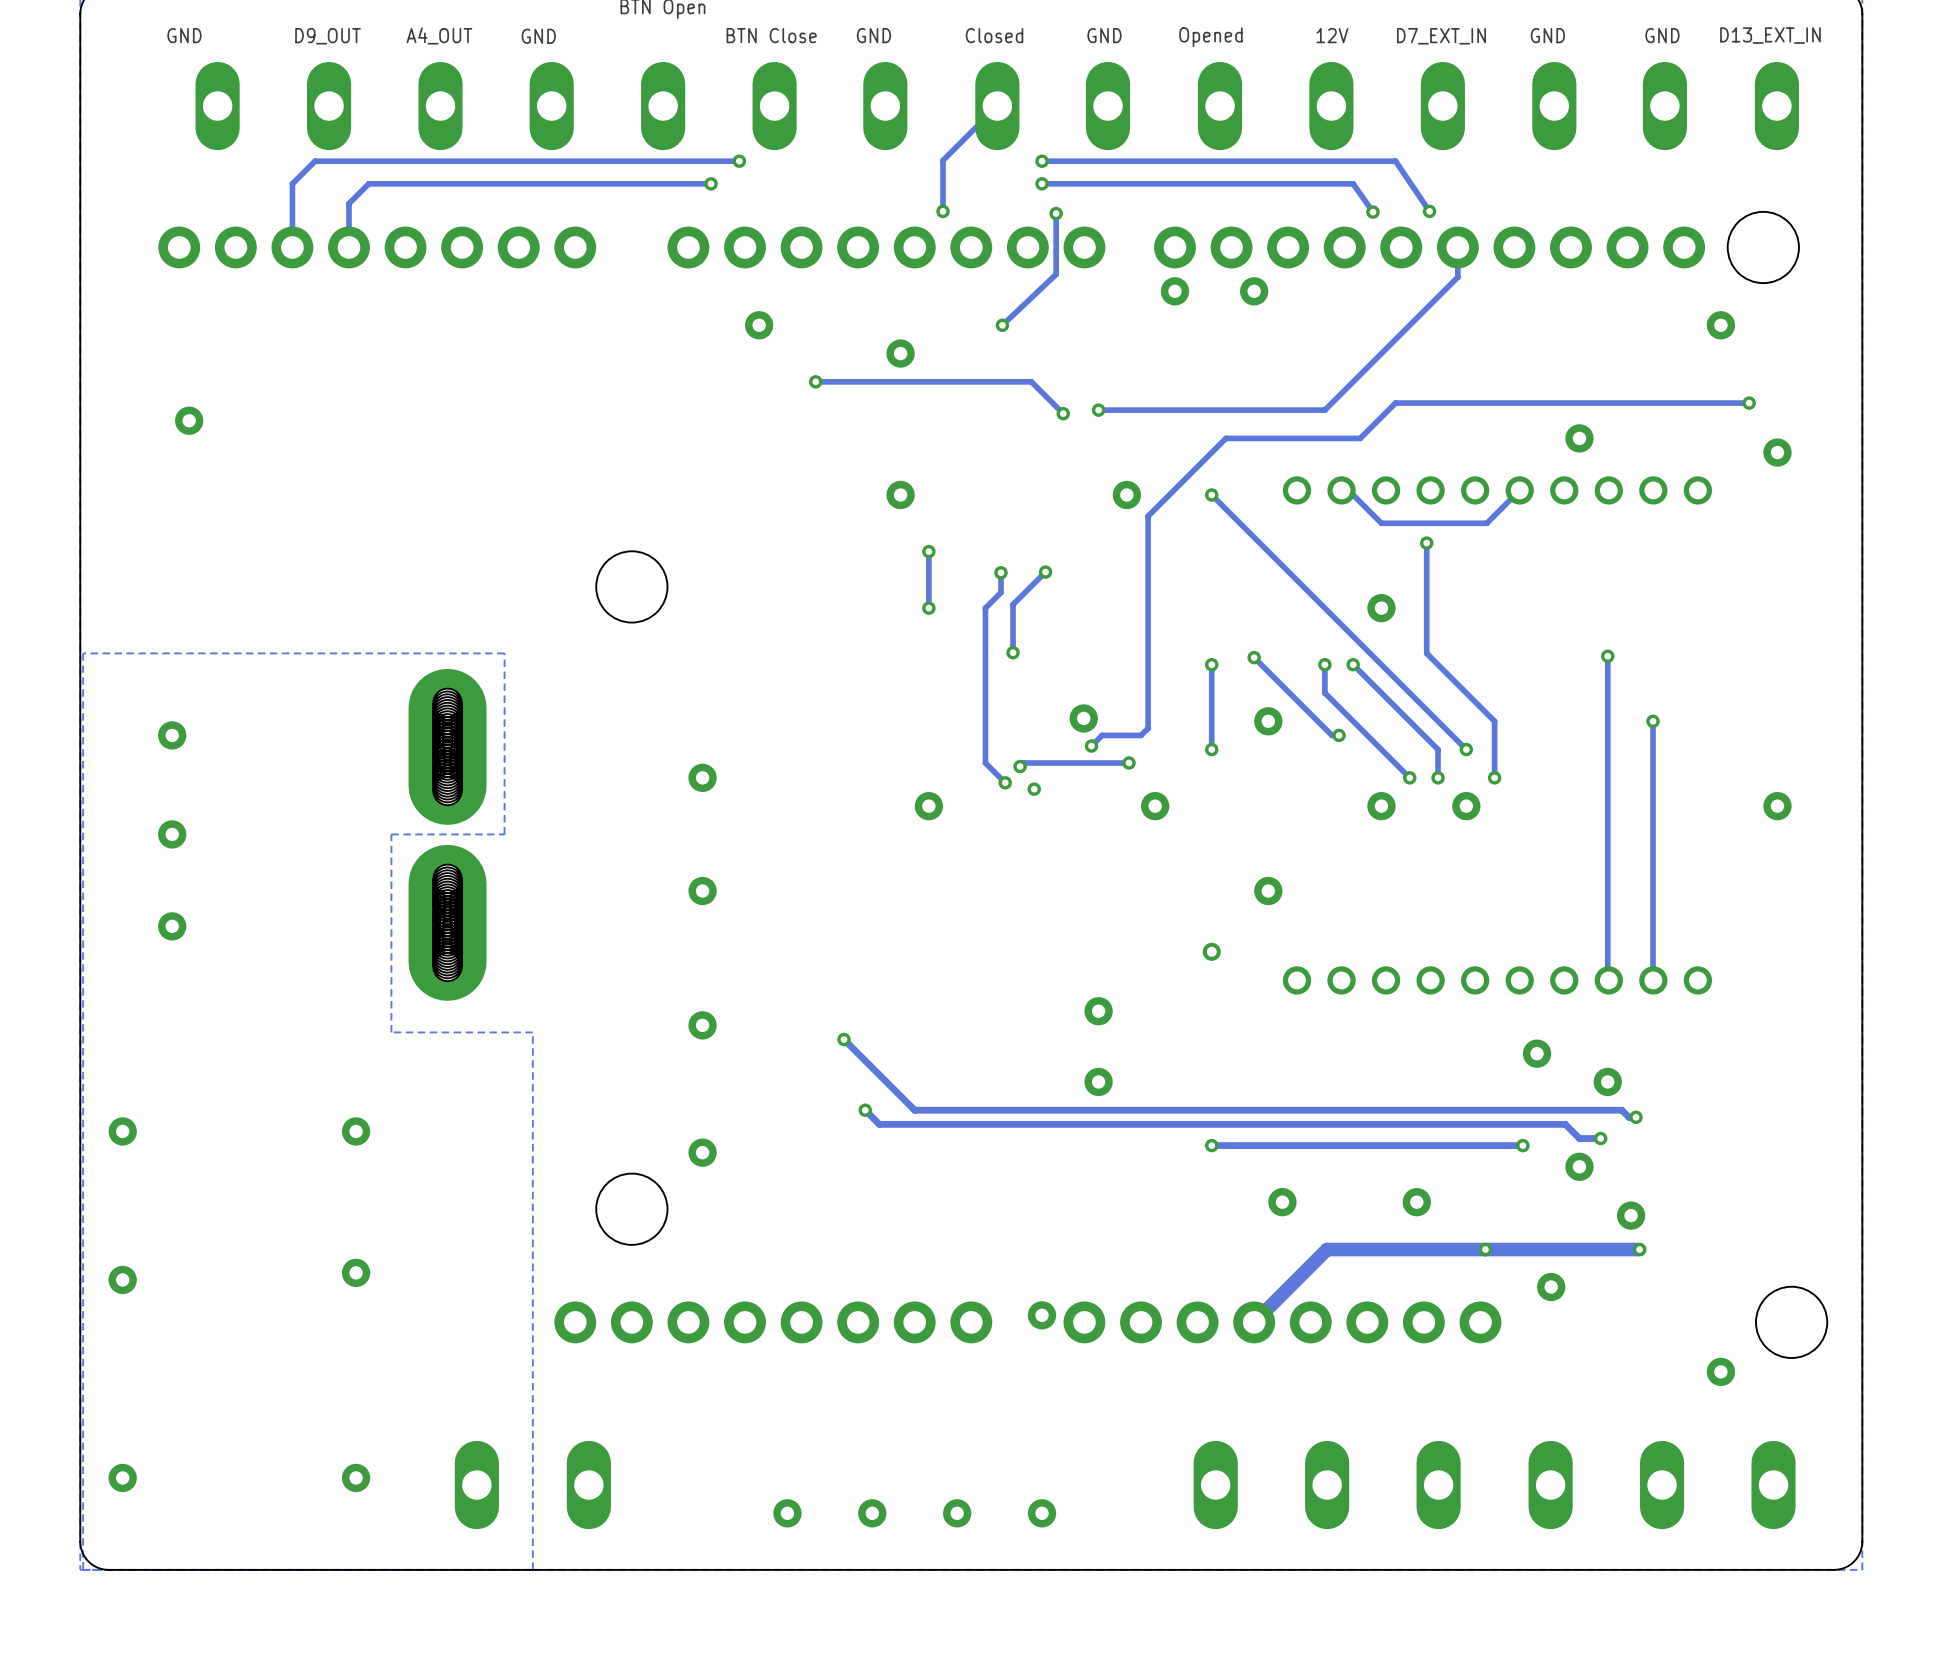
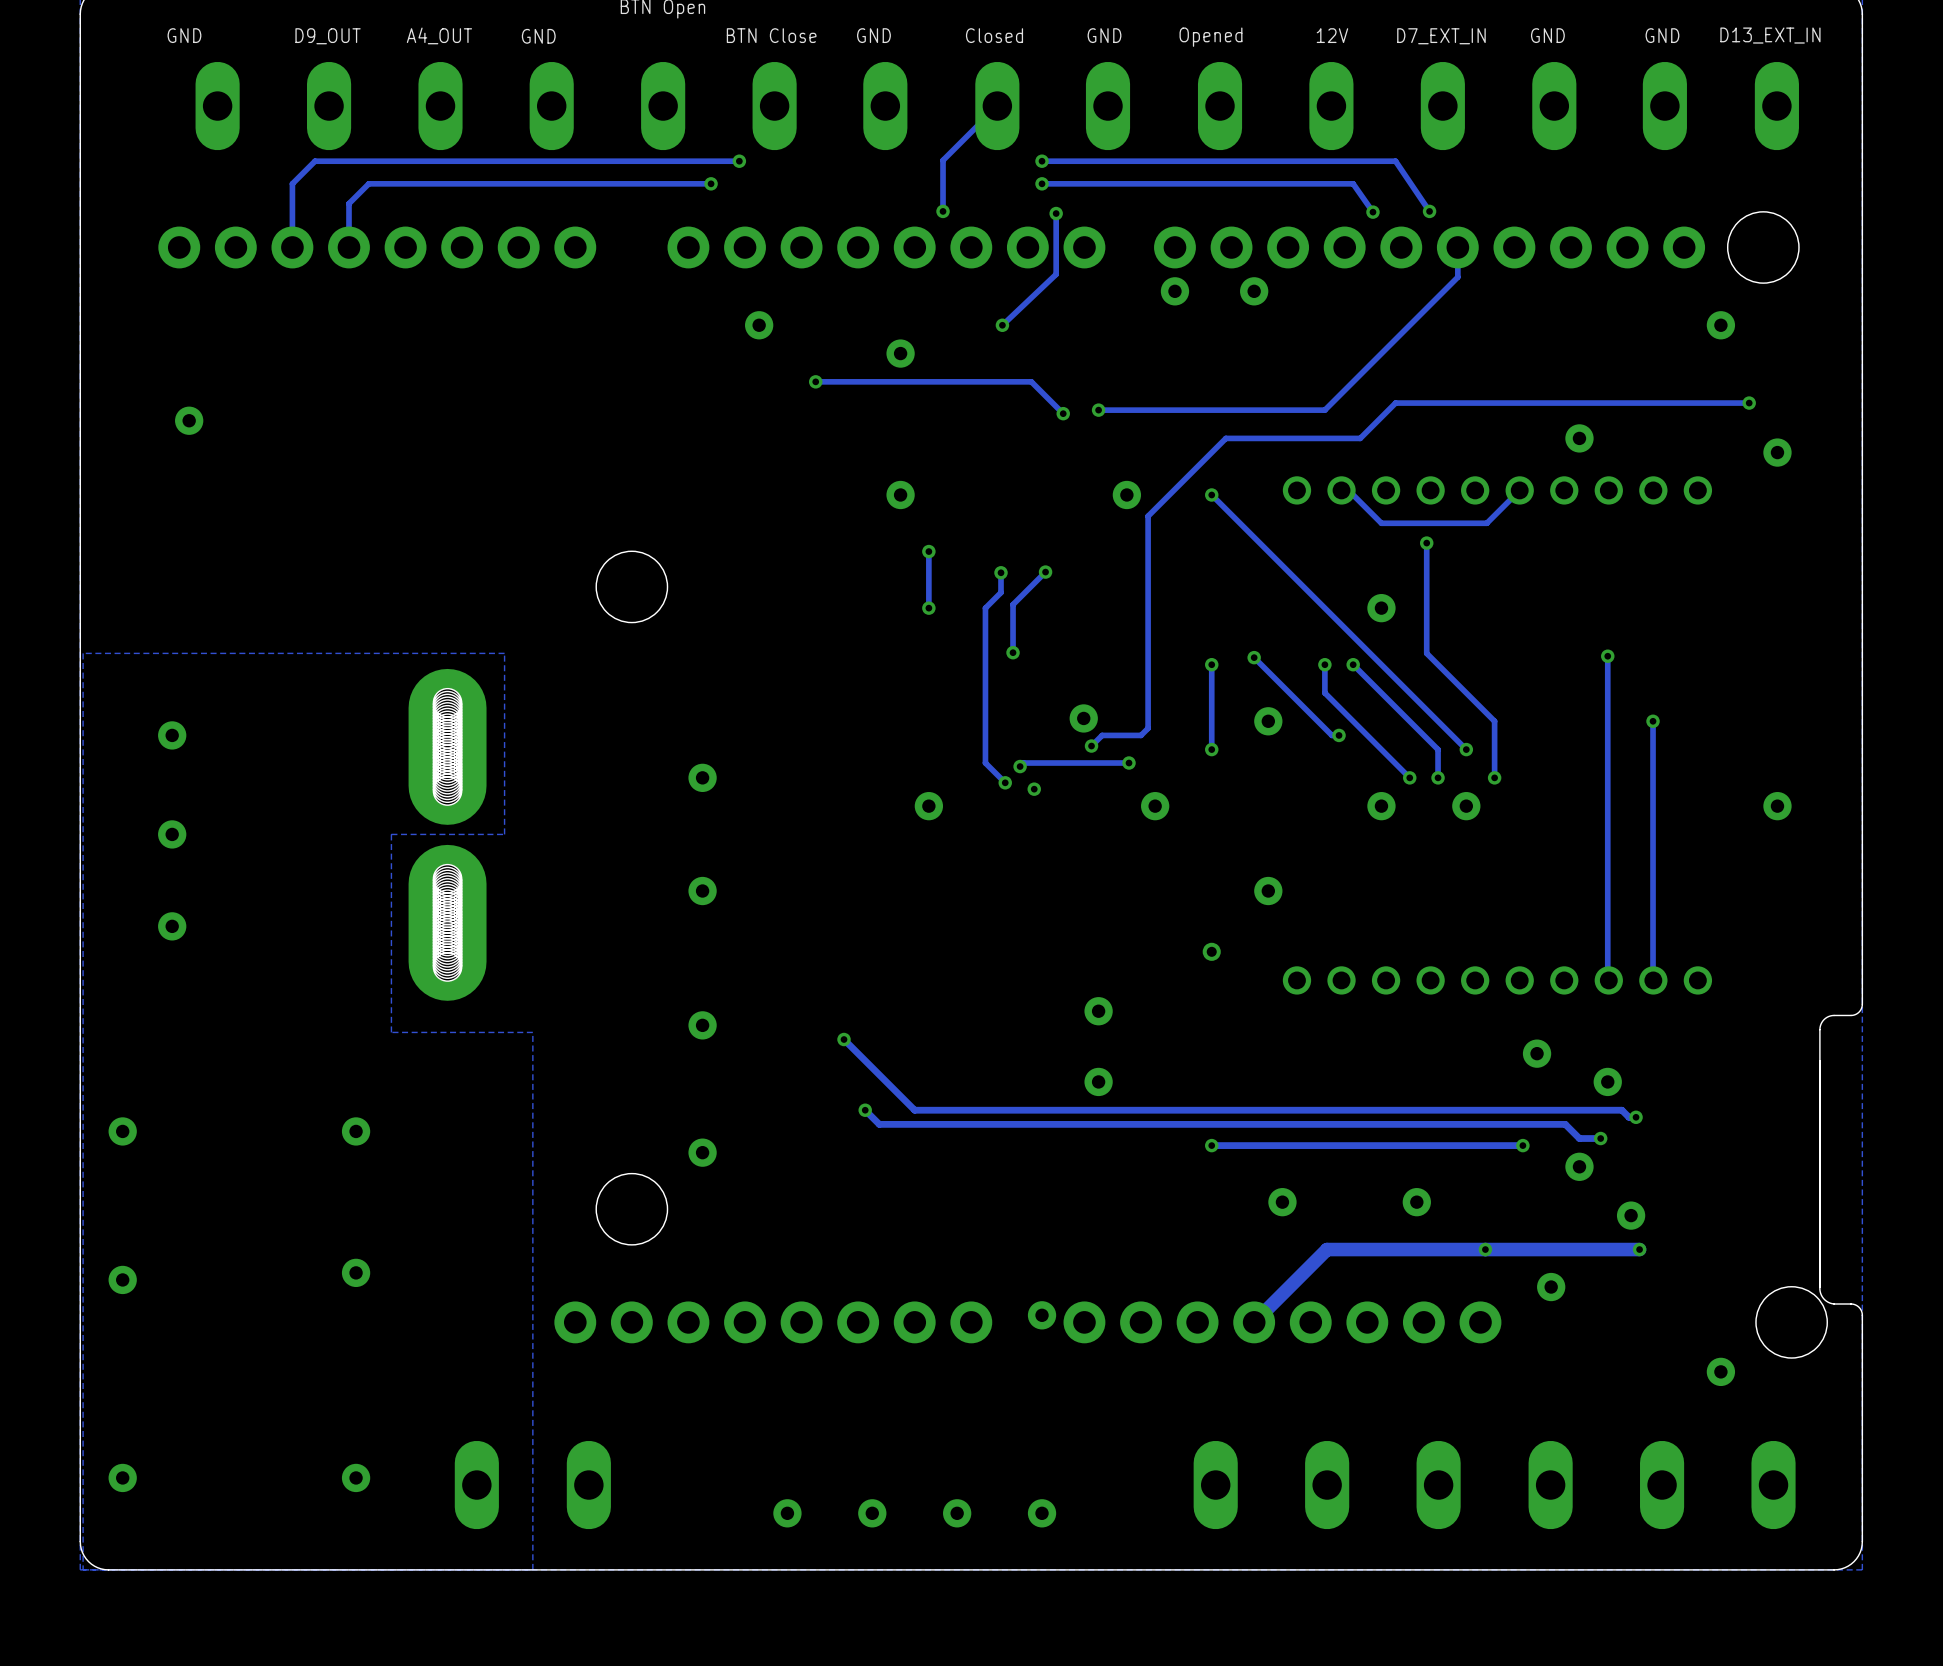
board edge: (1862, 1004) (1862, 1315) -> (1862, 1004) (1860, 1009) (1856, 1013) (1828, 1016) (1822, 1021) (1820, 1027) (1819, 1289) (1821, 1294) (1826, 1301) (1834, 1304) (1855, 1304) (1860, 1308) (1862, 1315)

